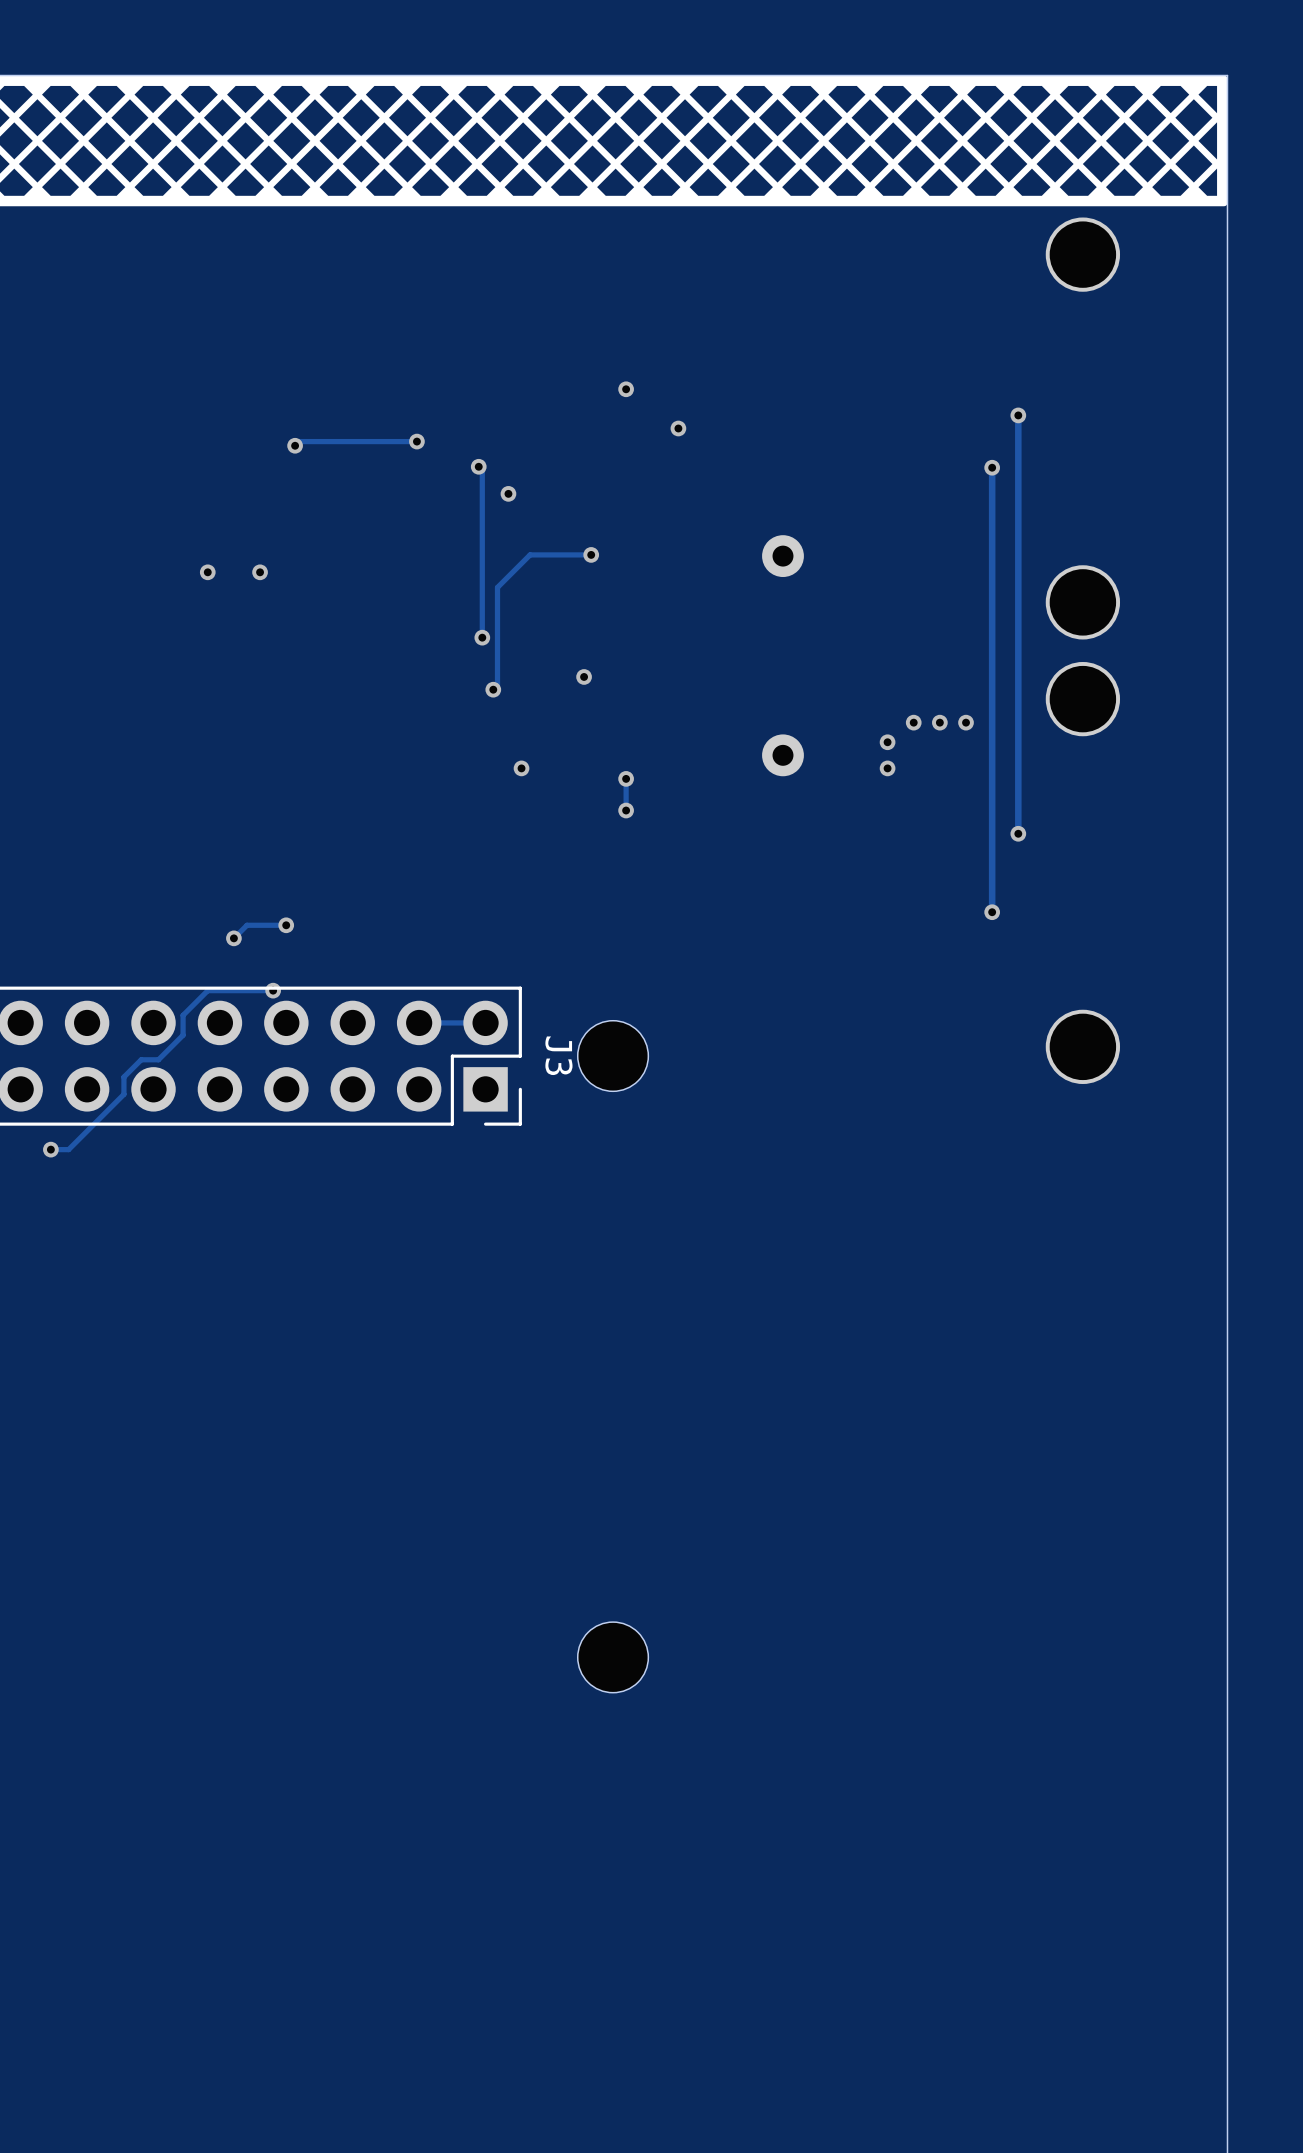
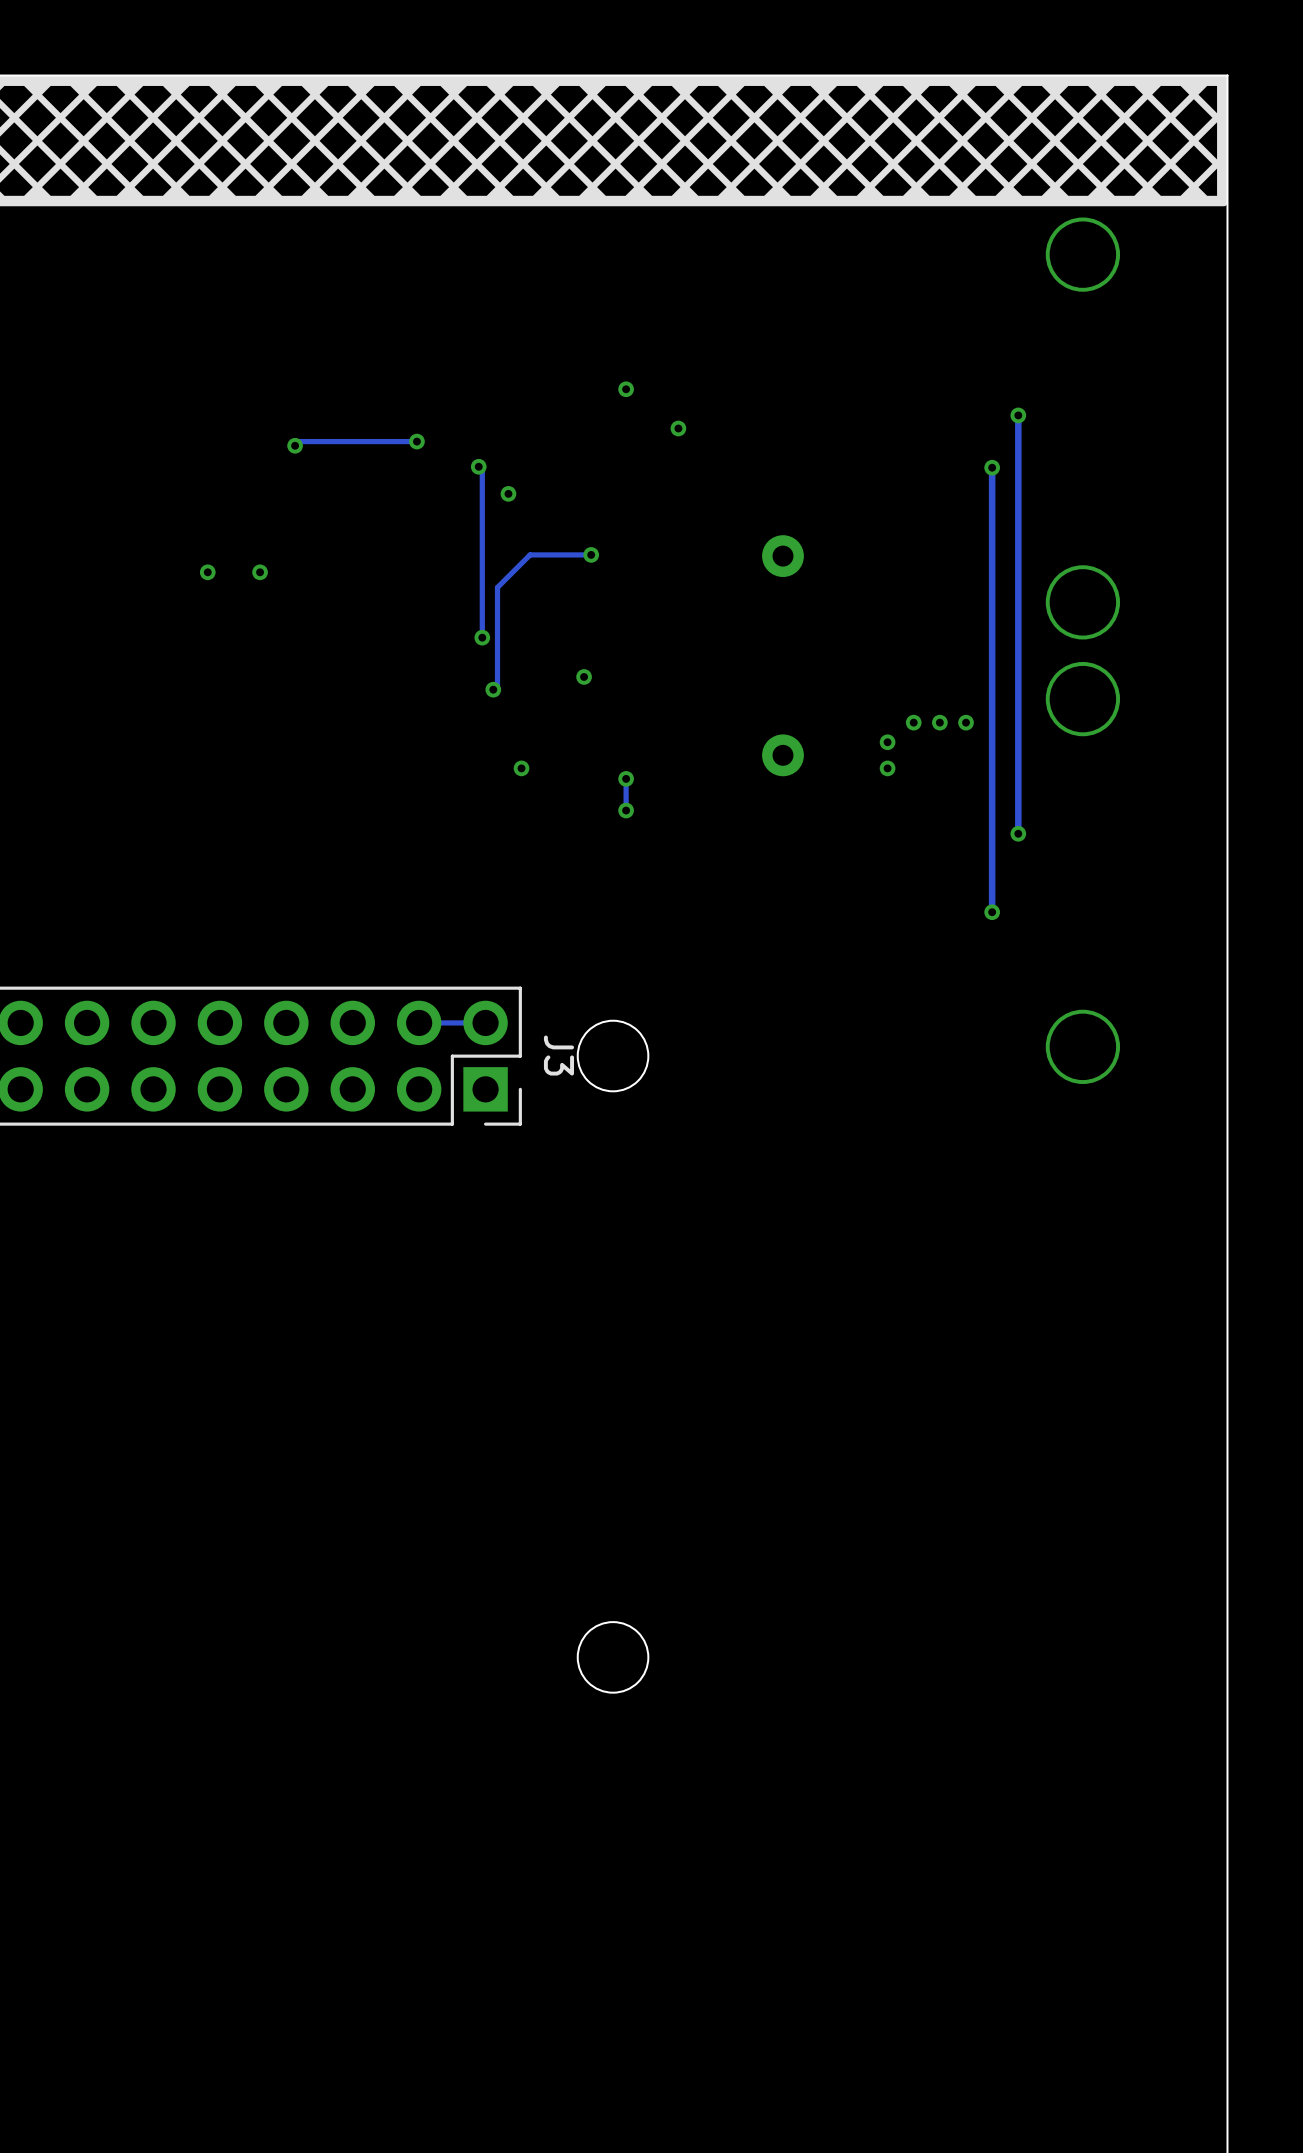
track: (286, 925) (246, 925) (233, 938) -> none
via: (286, 925) -> none
via: (233, 938) -> none
track: (273, 990) (207, 990) (183, 1015) (183, 1035) (158, 1059) (141, 1059) (123, 1077) (123, 1094) (68, 1149) (50, 1149) -> none
via: (273, 990) -> none
via: (50, 1149) -> none

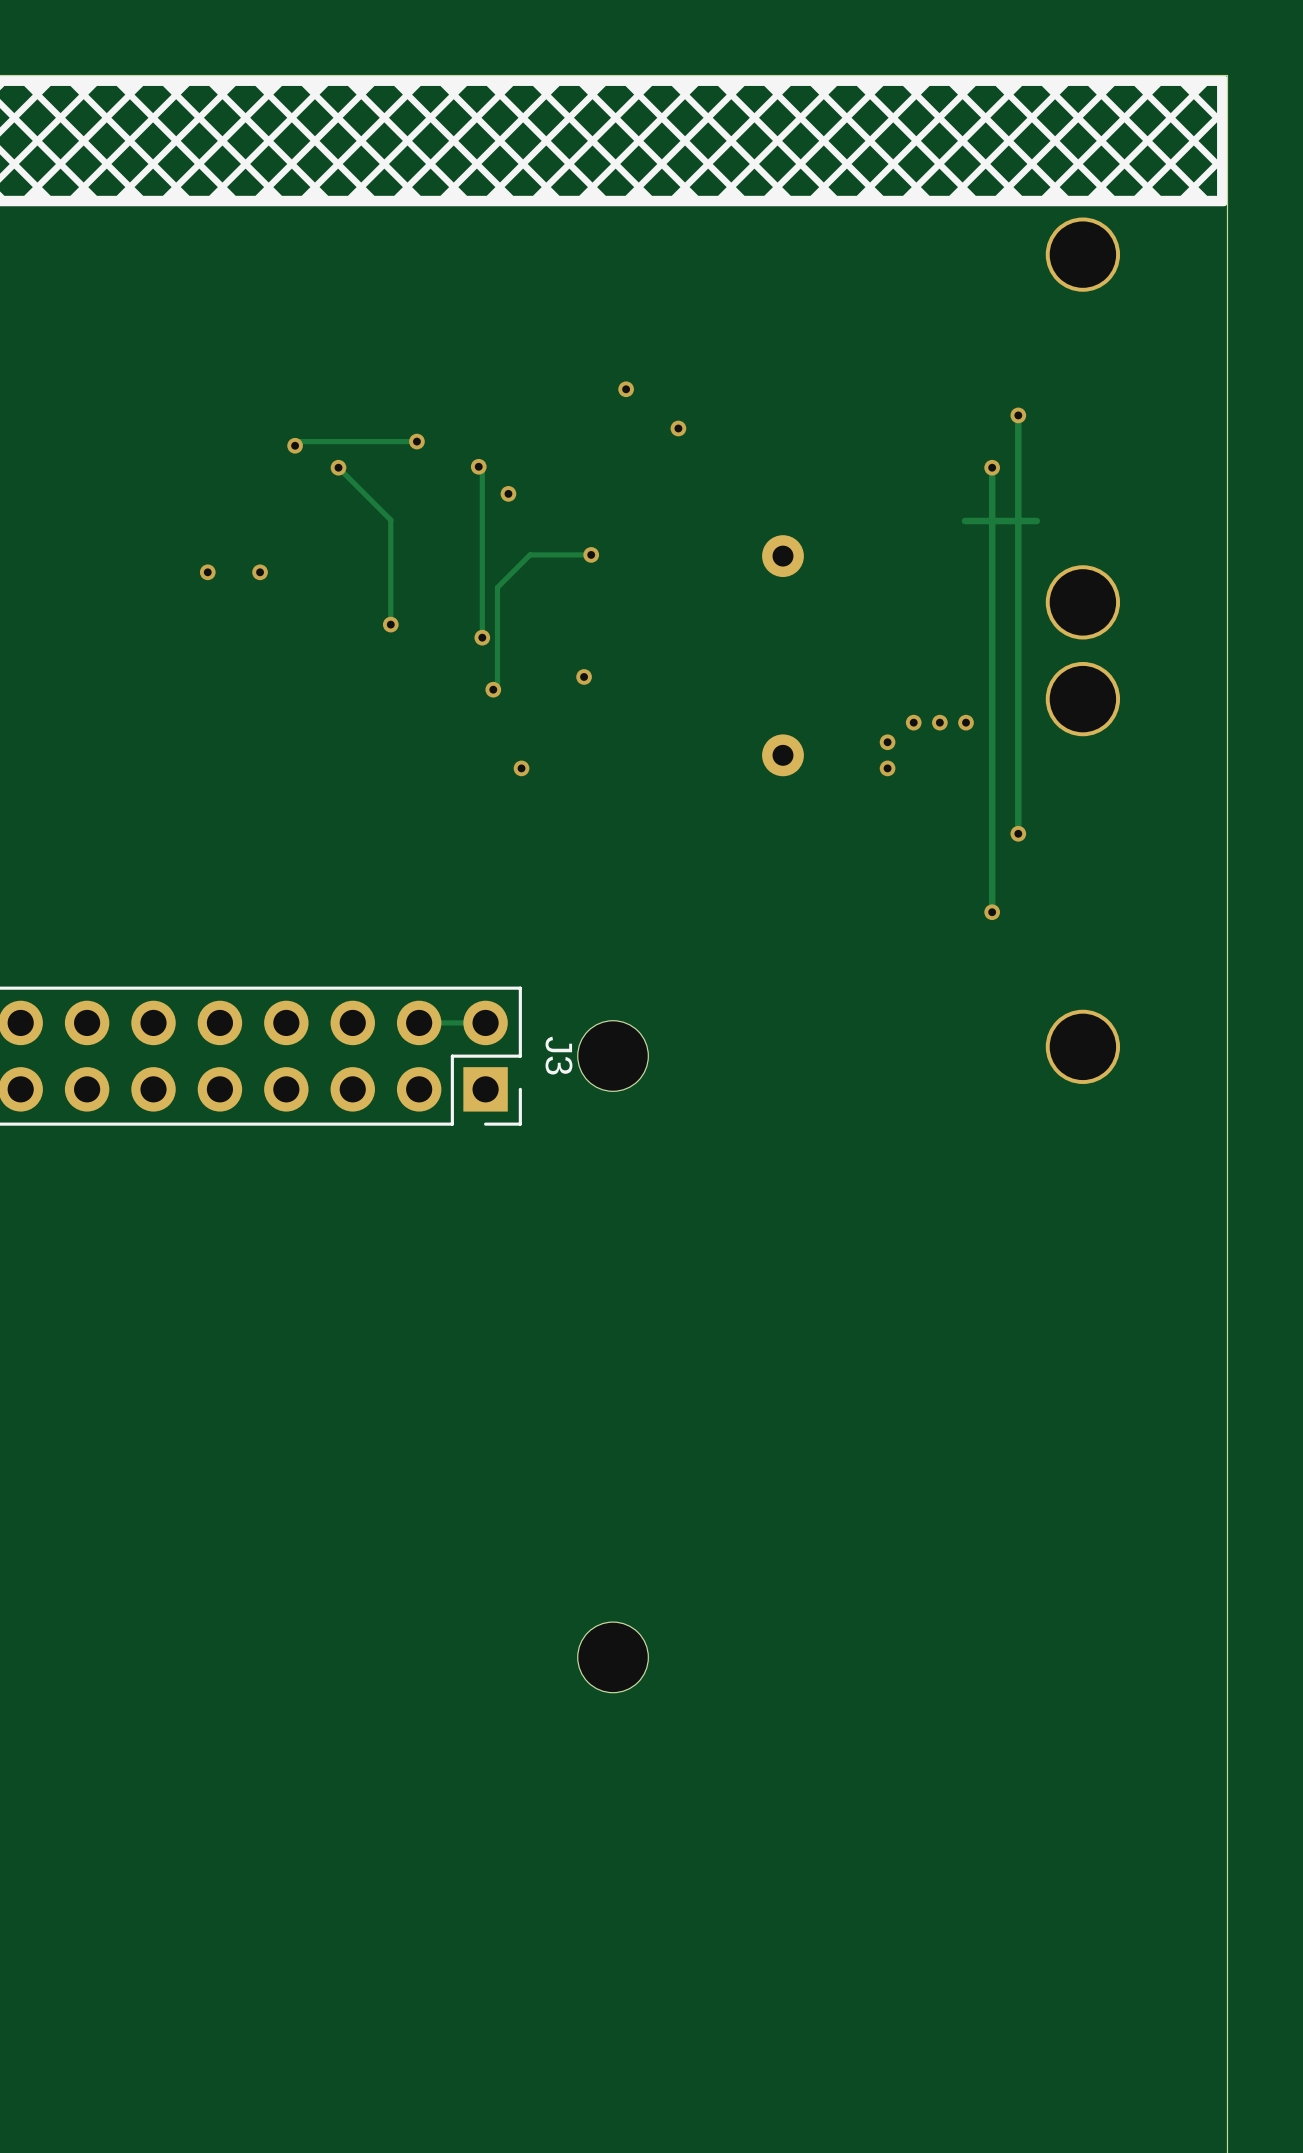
track: none -> (338, 467) (390, 520) (390, 624)
via: none -> (338, 467)
track: none -> (1036, 521) (965, 521)
via: none -> (390, 624)
track: (626, 778) (626, 810) -> none
via: (626, 778) -> none
via: (626, 810) -> none

